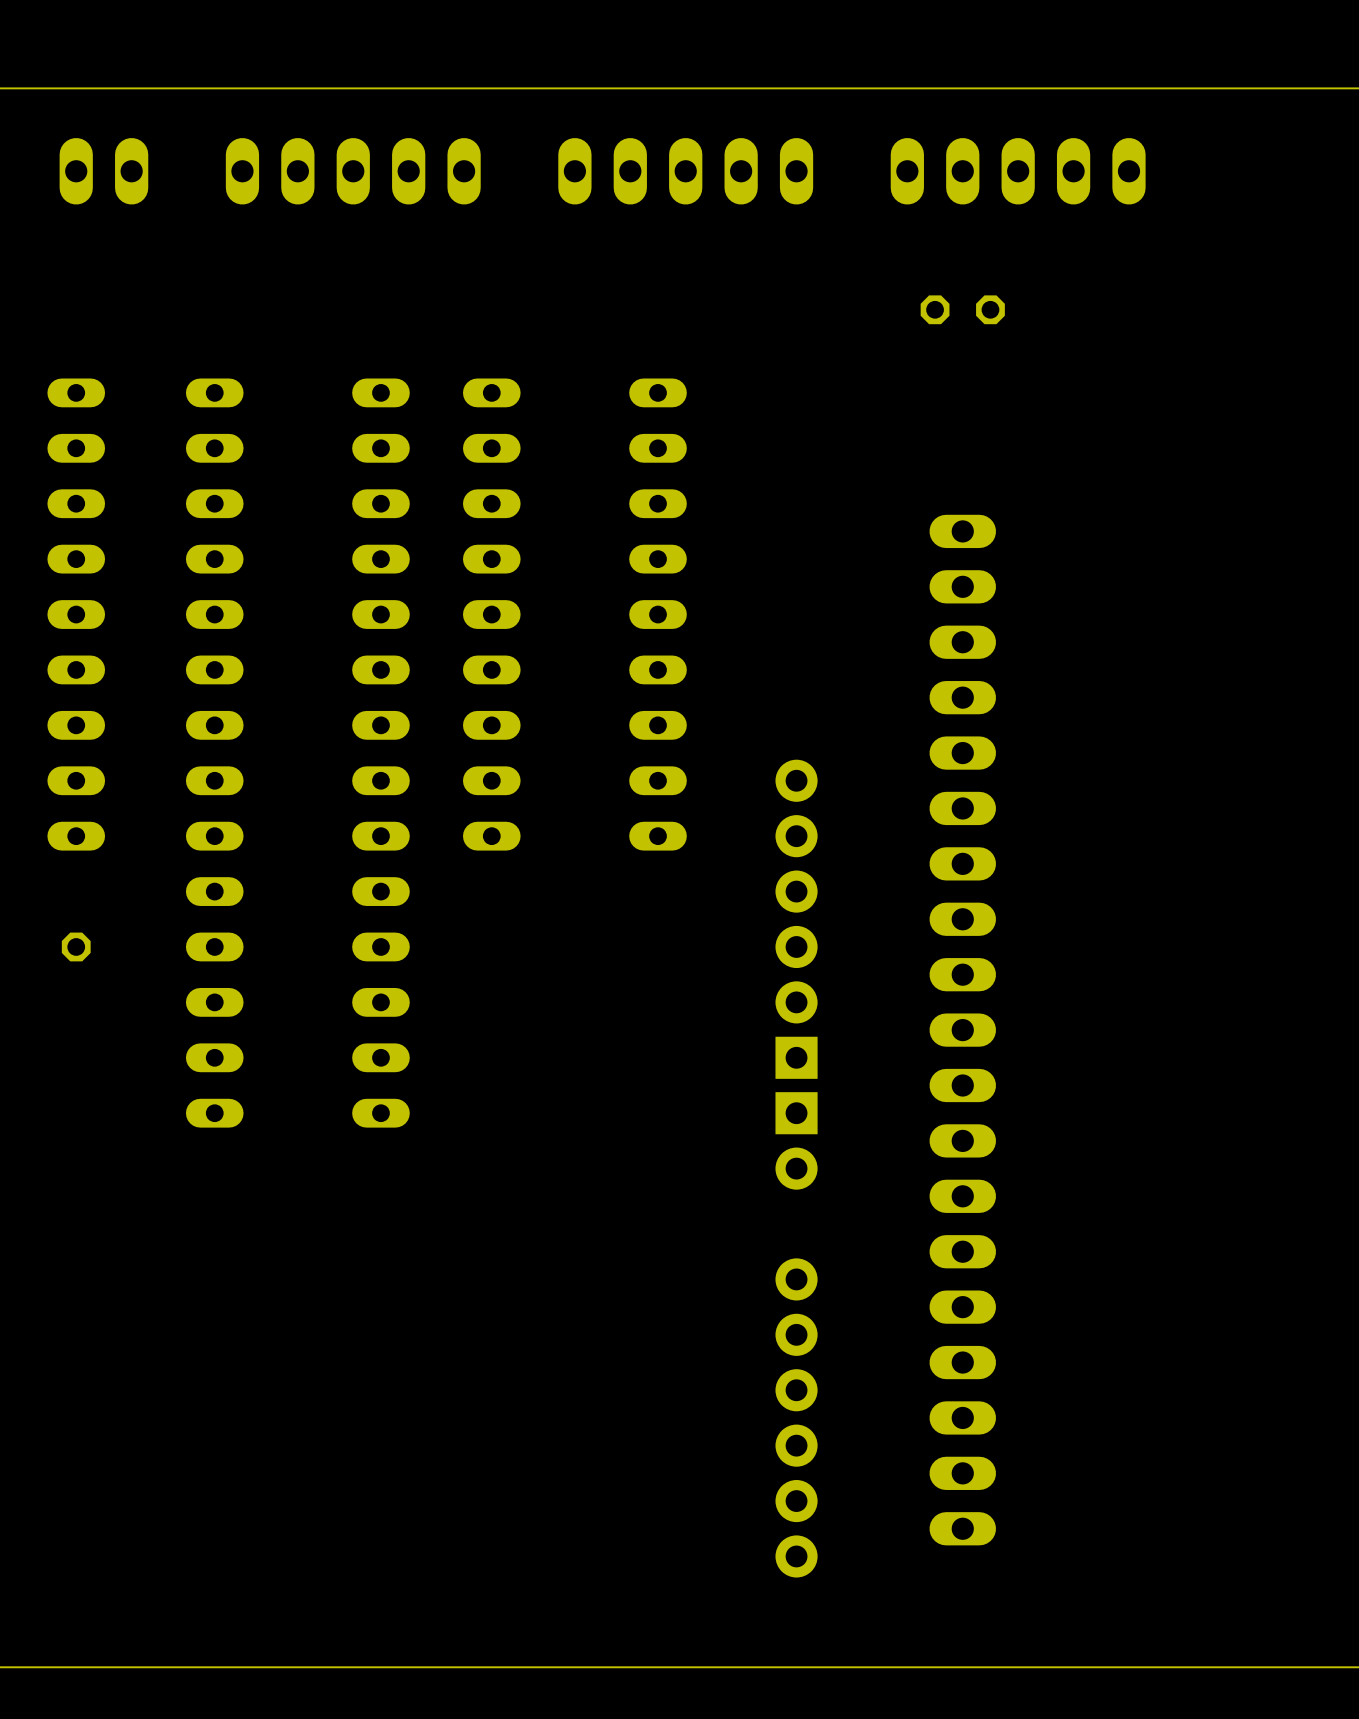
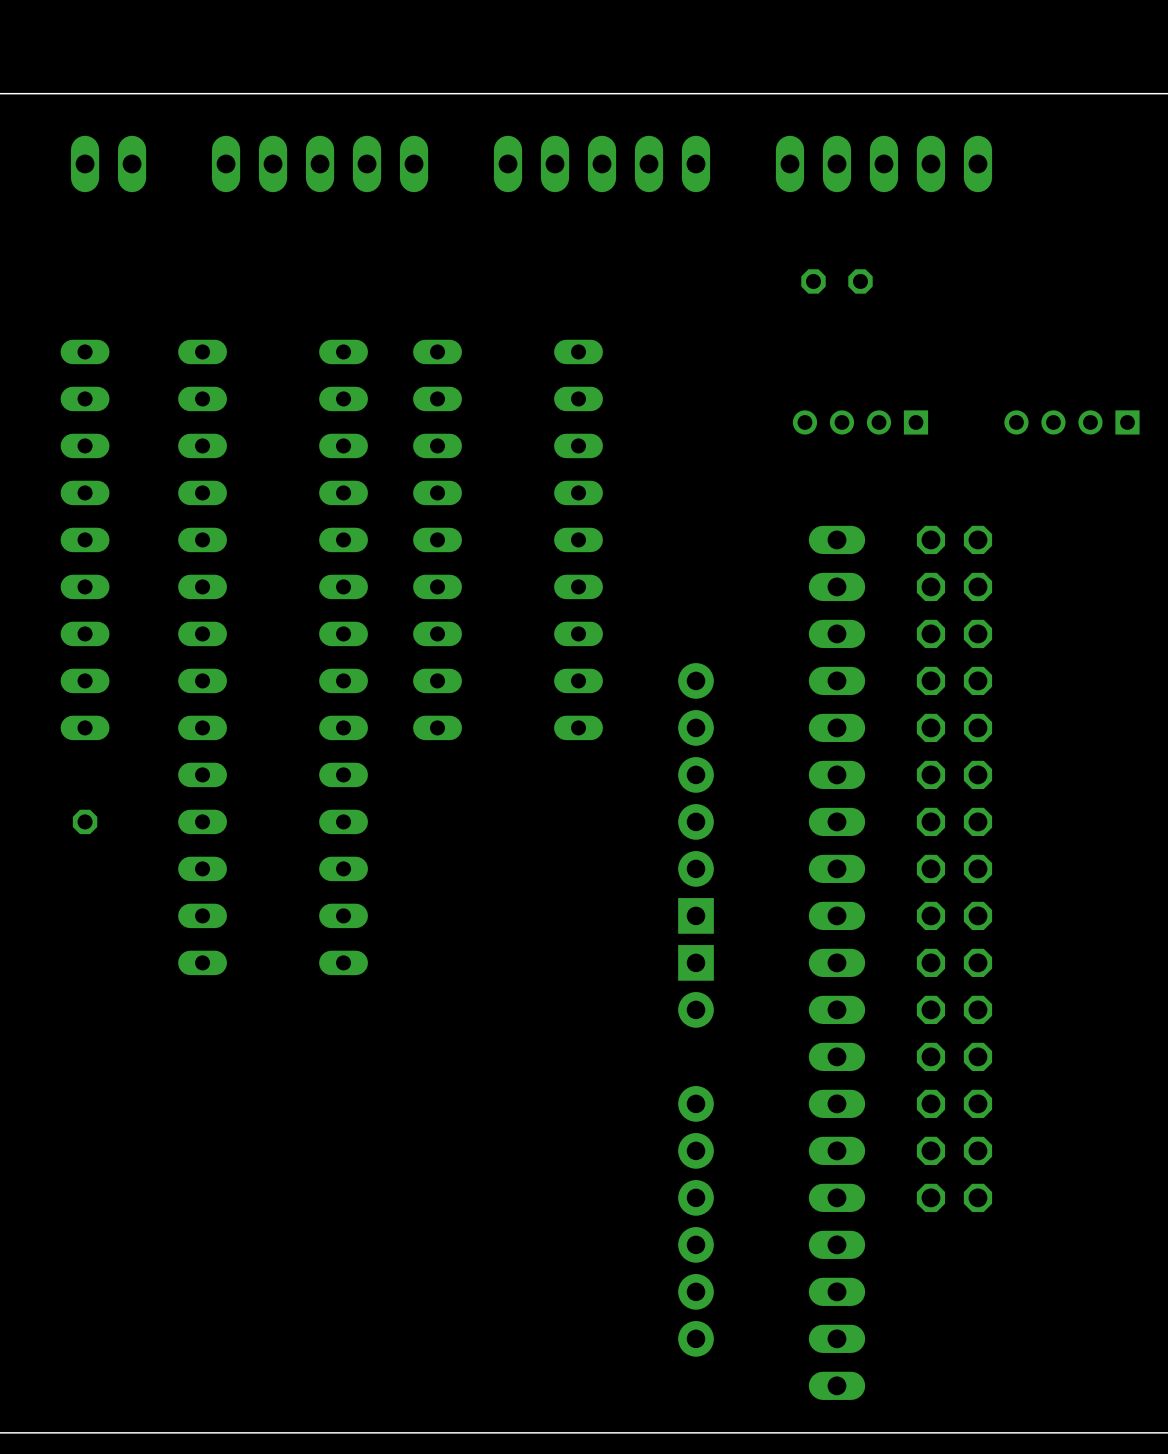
part: none -> (860, 422)
part: none -> (1071, 422)
part: none -> (954, 868)
part position: (962, 1030) -> (836, 962)

